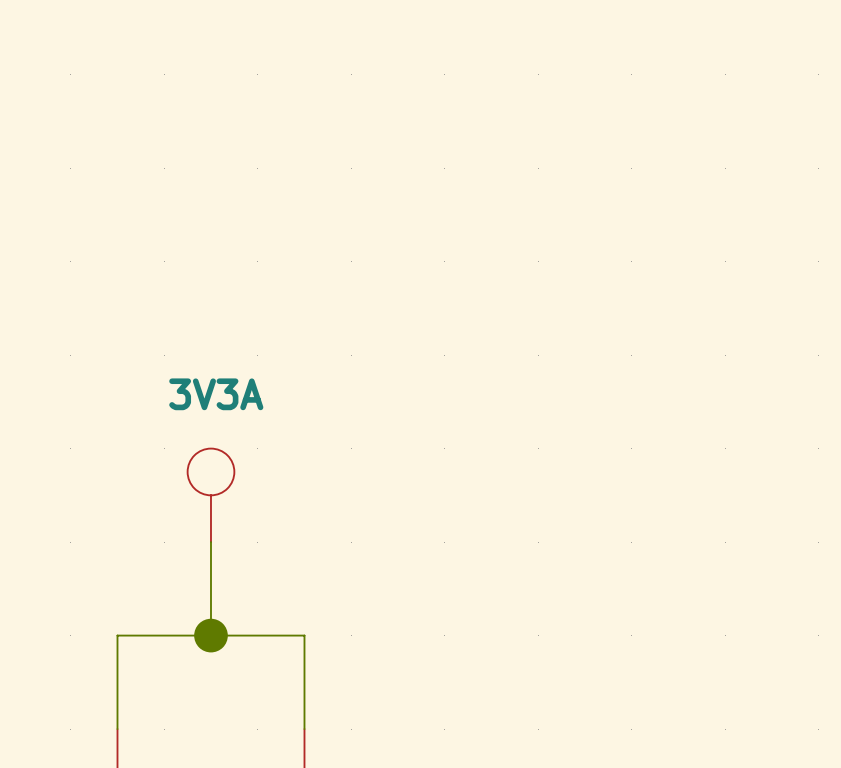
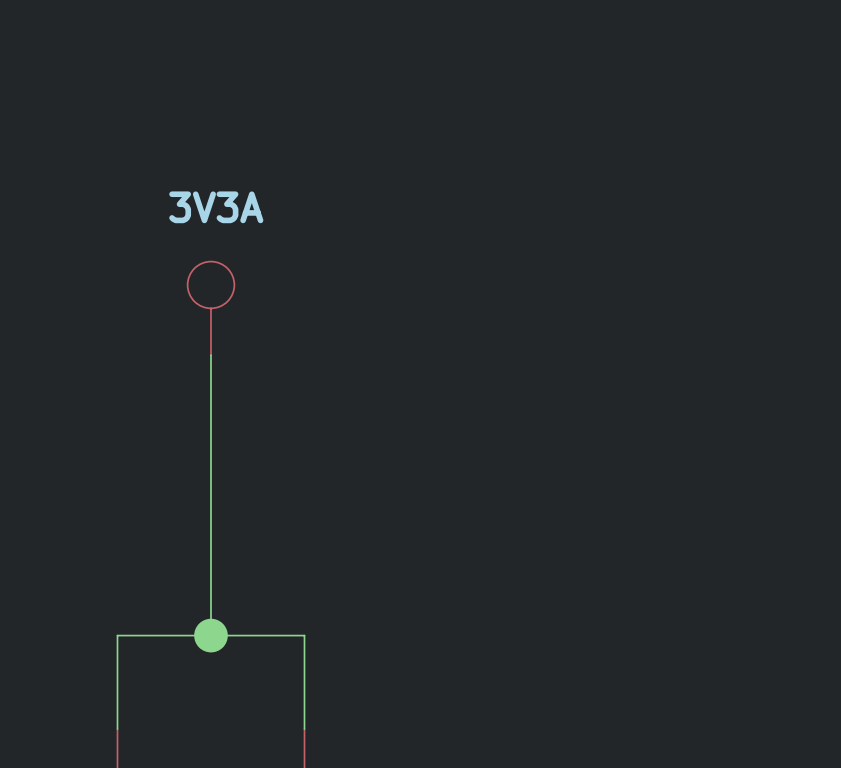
wire: none -> (210, 355) (210, 542)
power symbol position: 3V3A (210, 495) -> 3V3A (210, 308)

